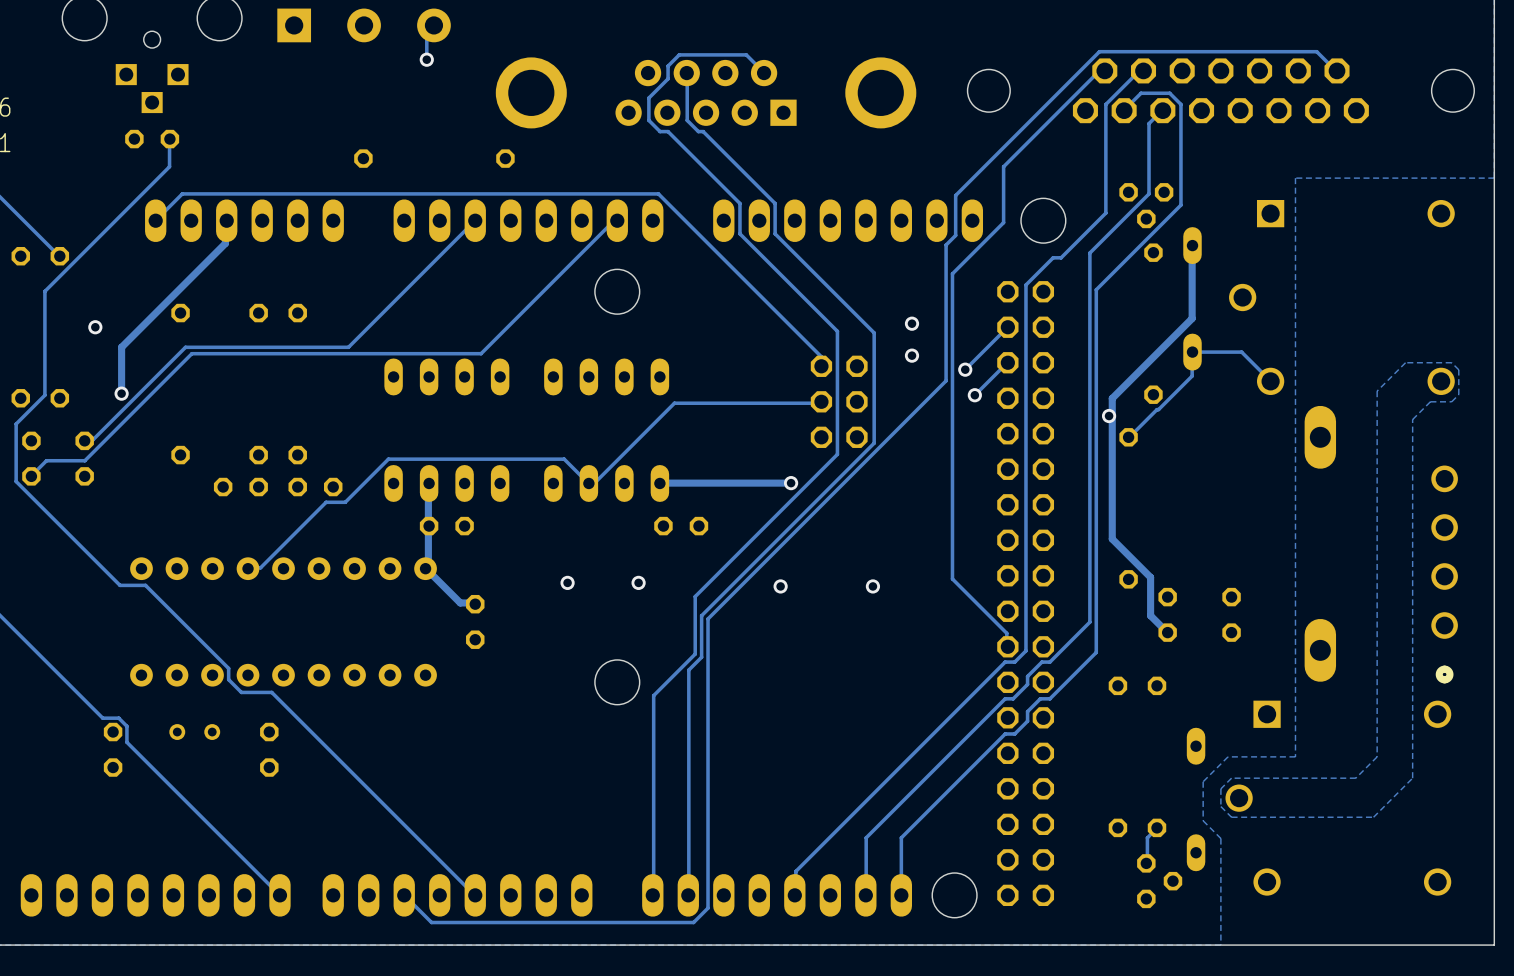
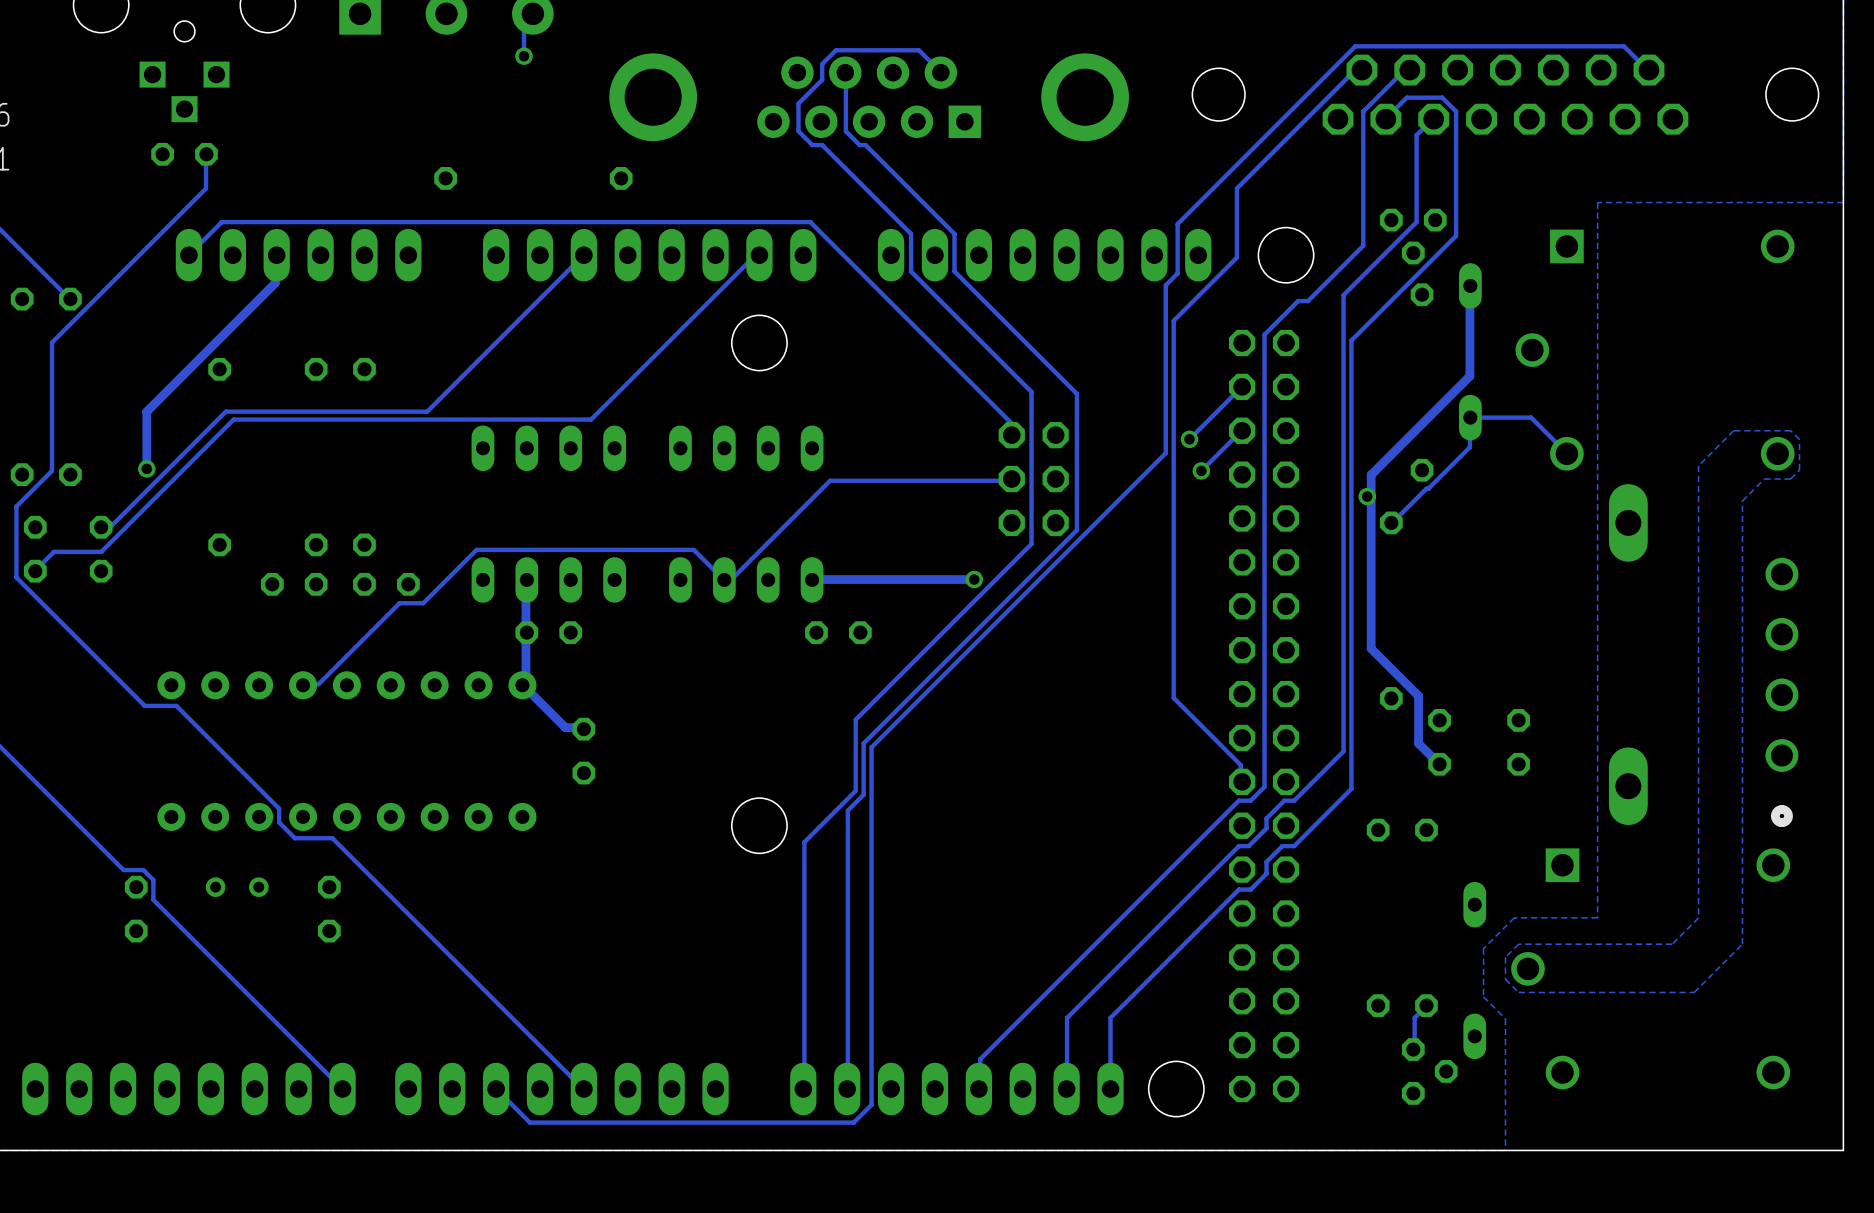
via: (912, 323) -> none
via: (95, 327) -> none
via: (912, 355) -> none
via: (567, 582) -> none
via: (638, 582) -> none
via: (780, 586) -> none
via: (872, 586) -> none

